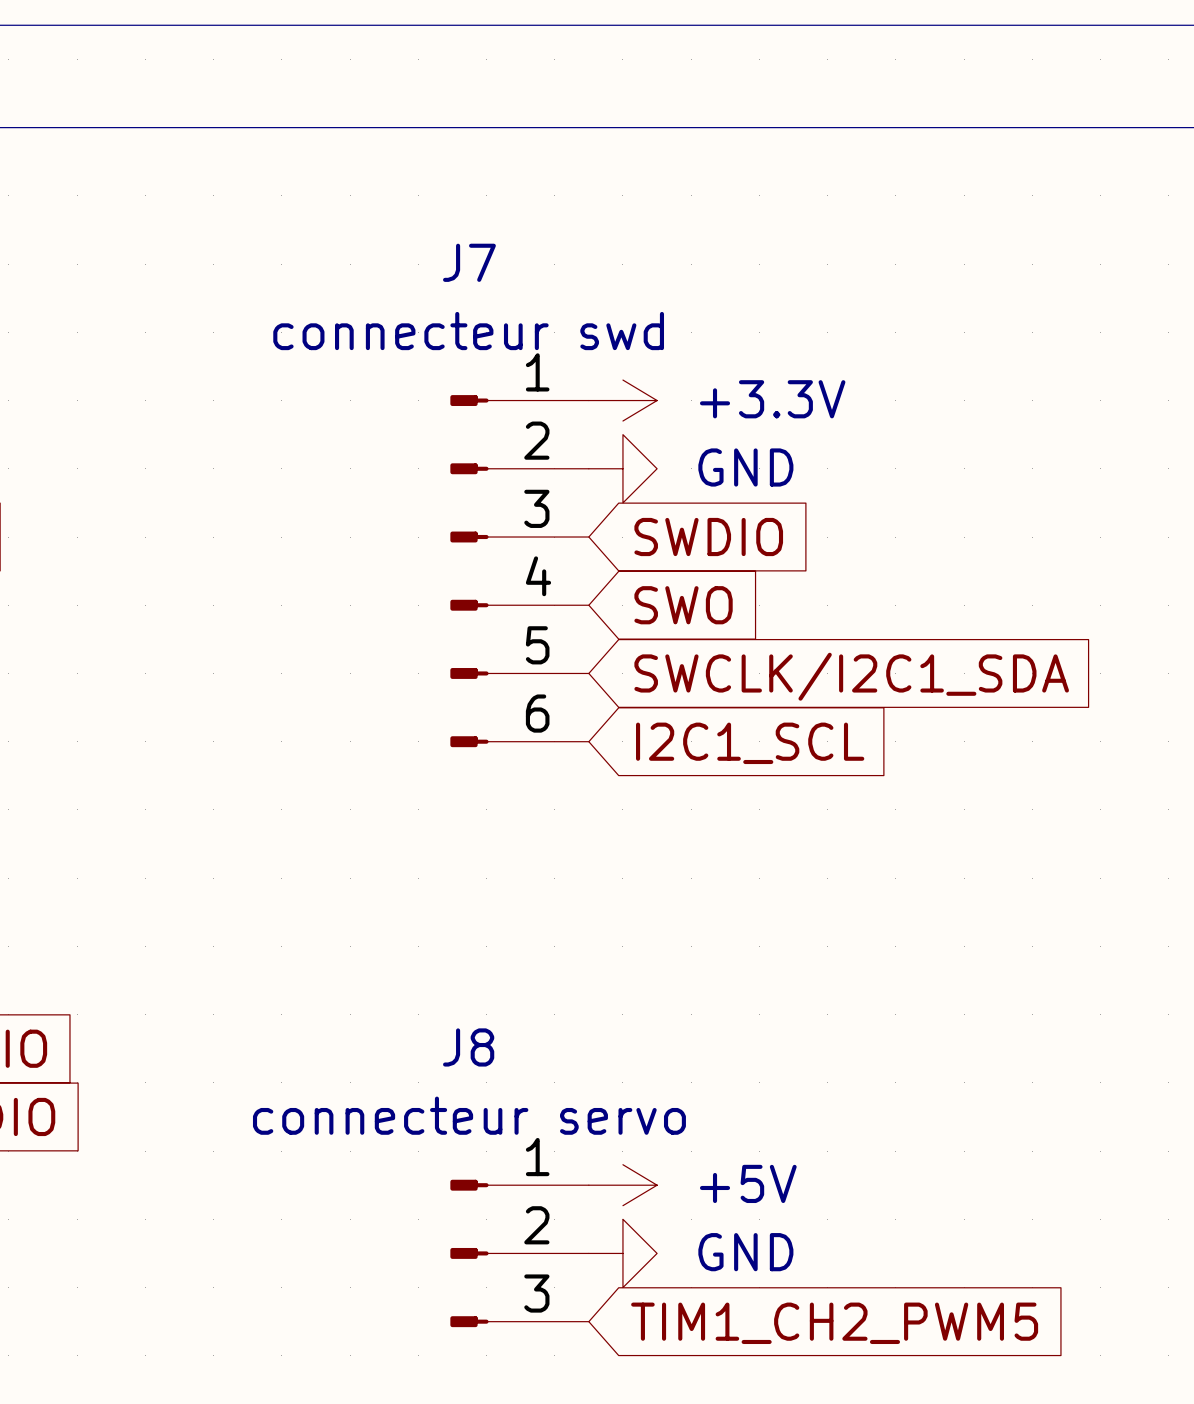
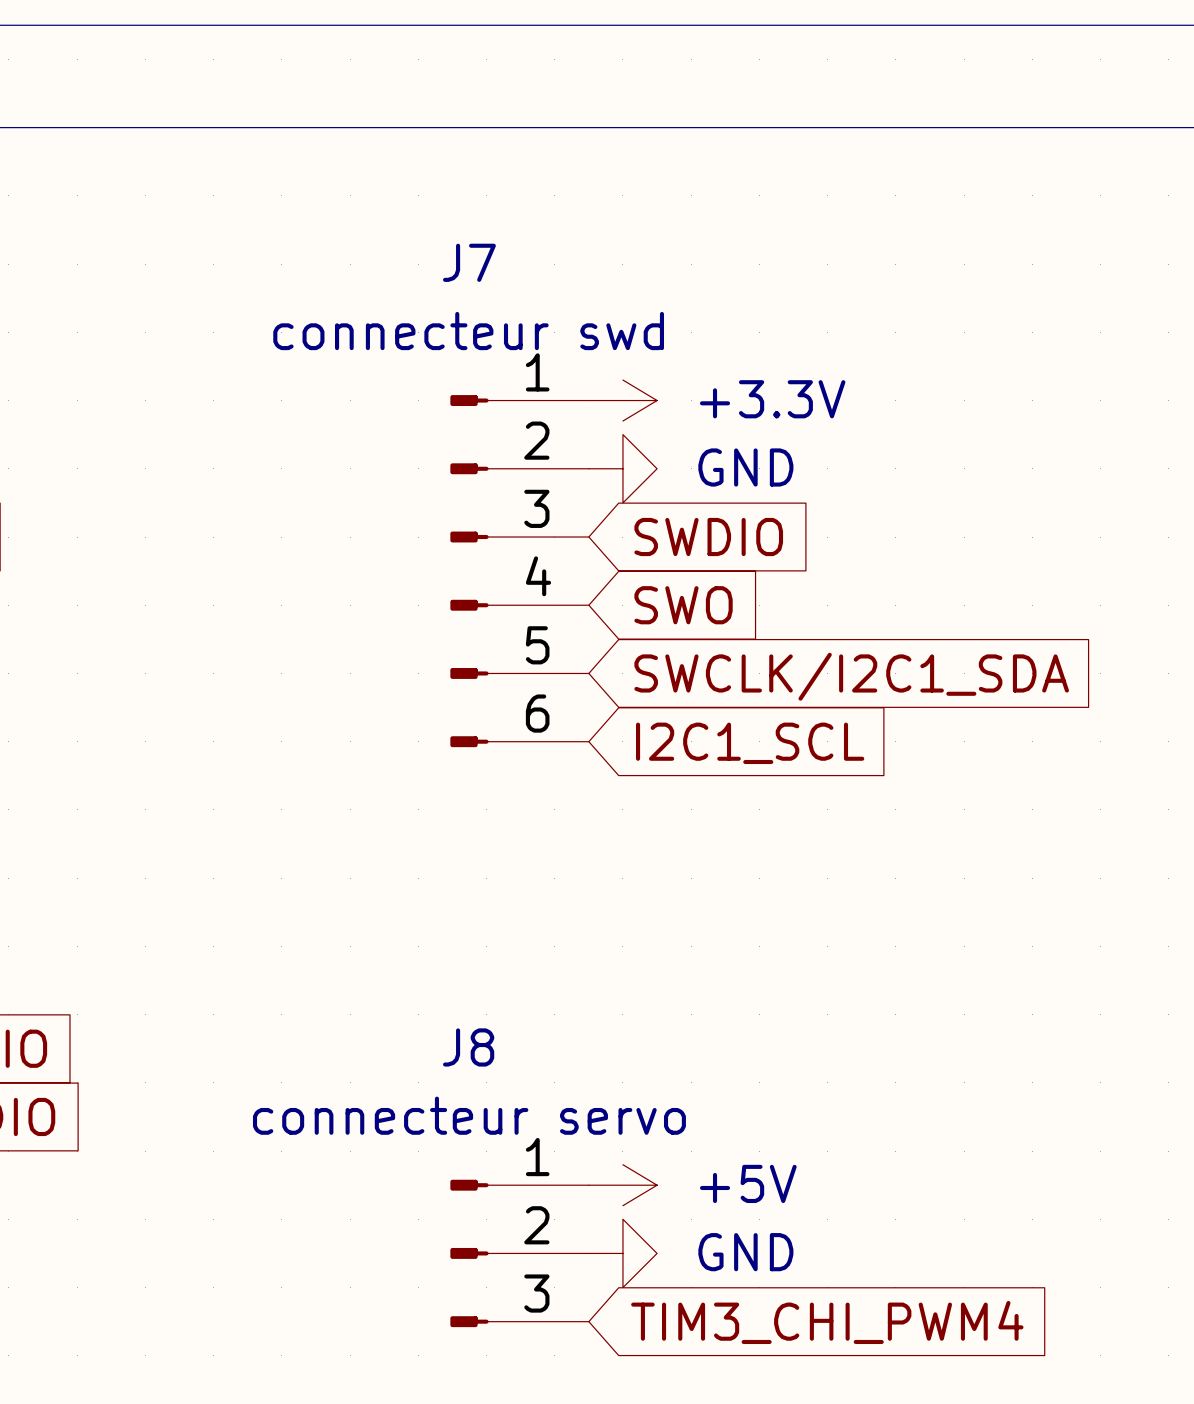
global label: TIM1_CH2_PWM5 (834, 1323) -> TIM3_CHI_PWM4 (827, 1322)

